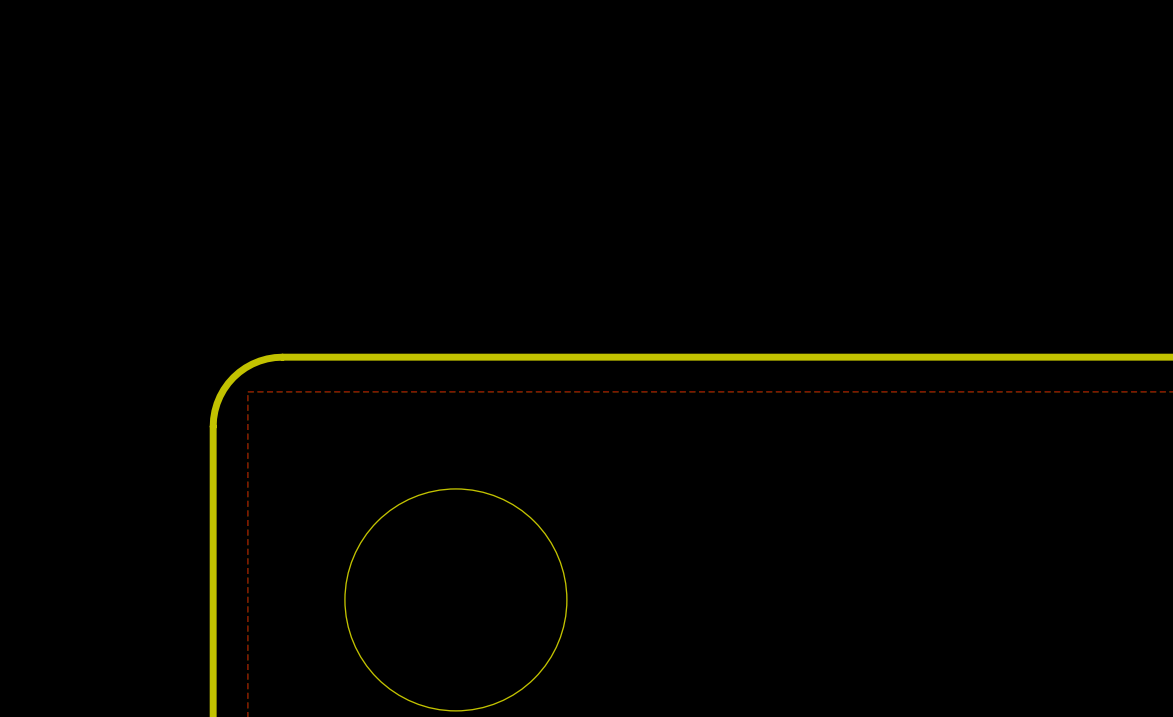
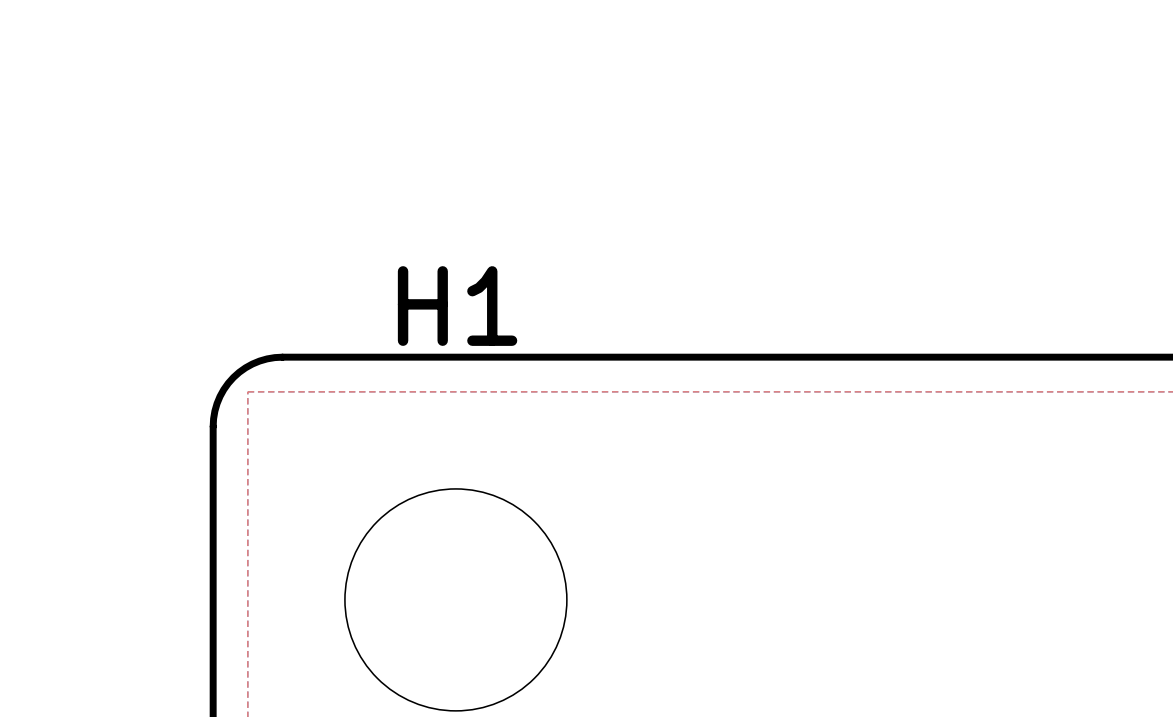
H1 name: none -> H1 (457, 306)

